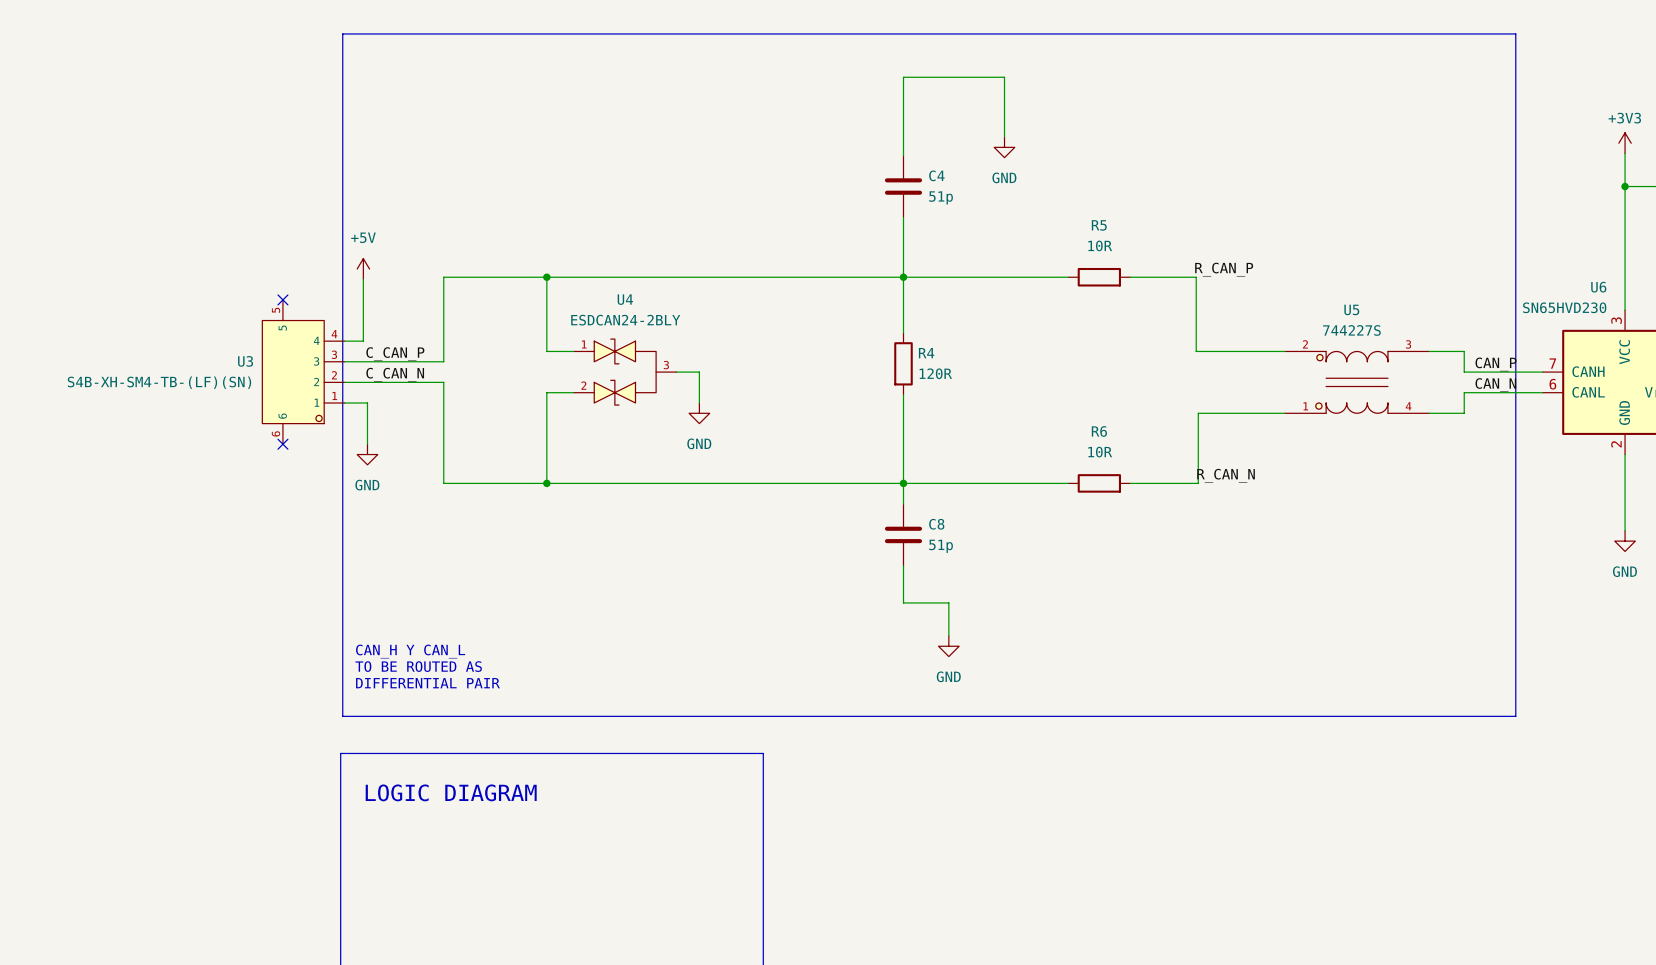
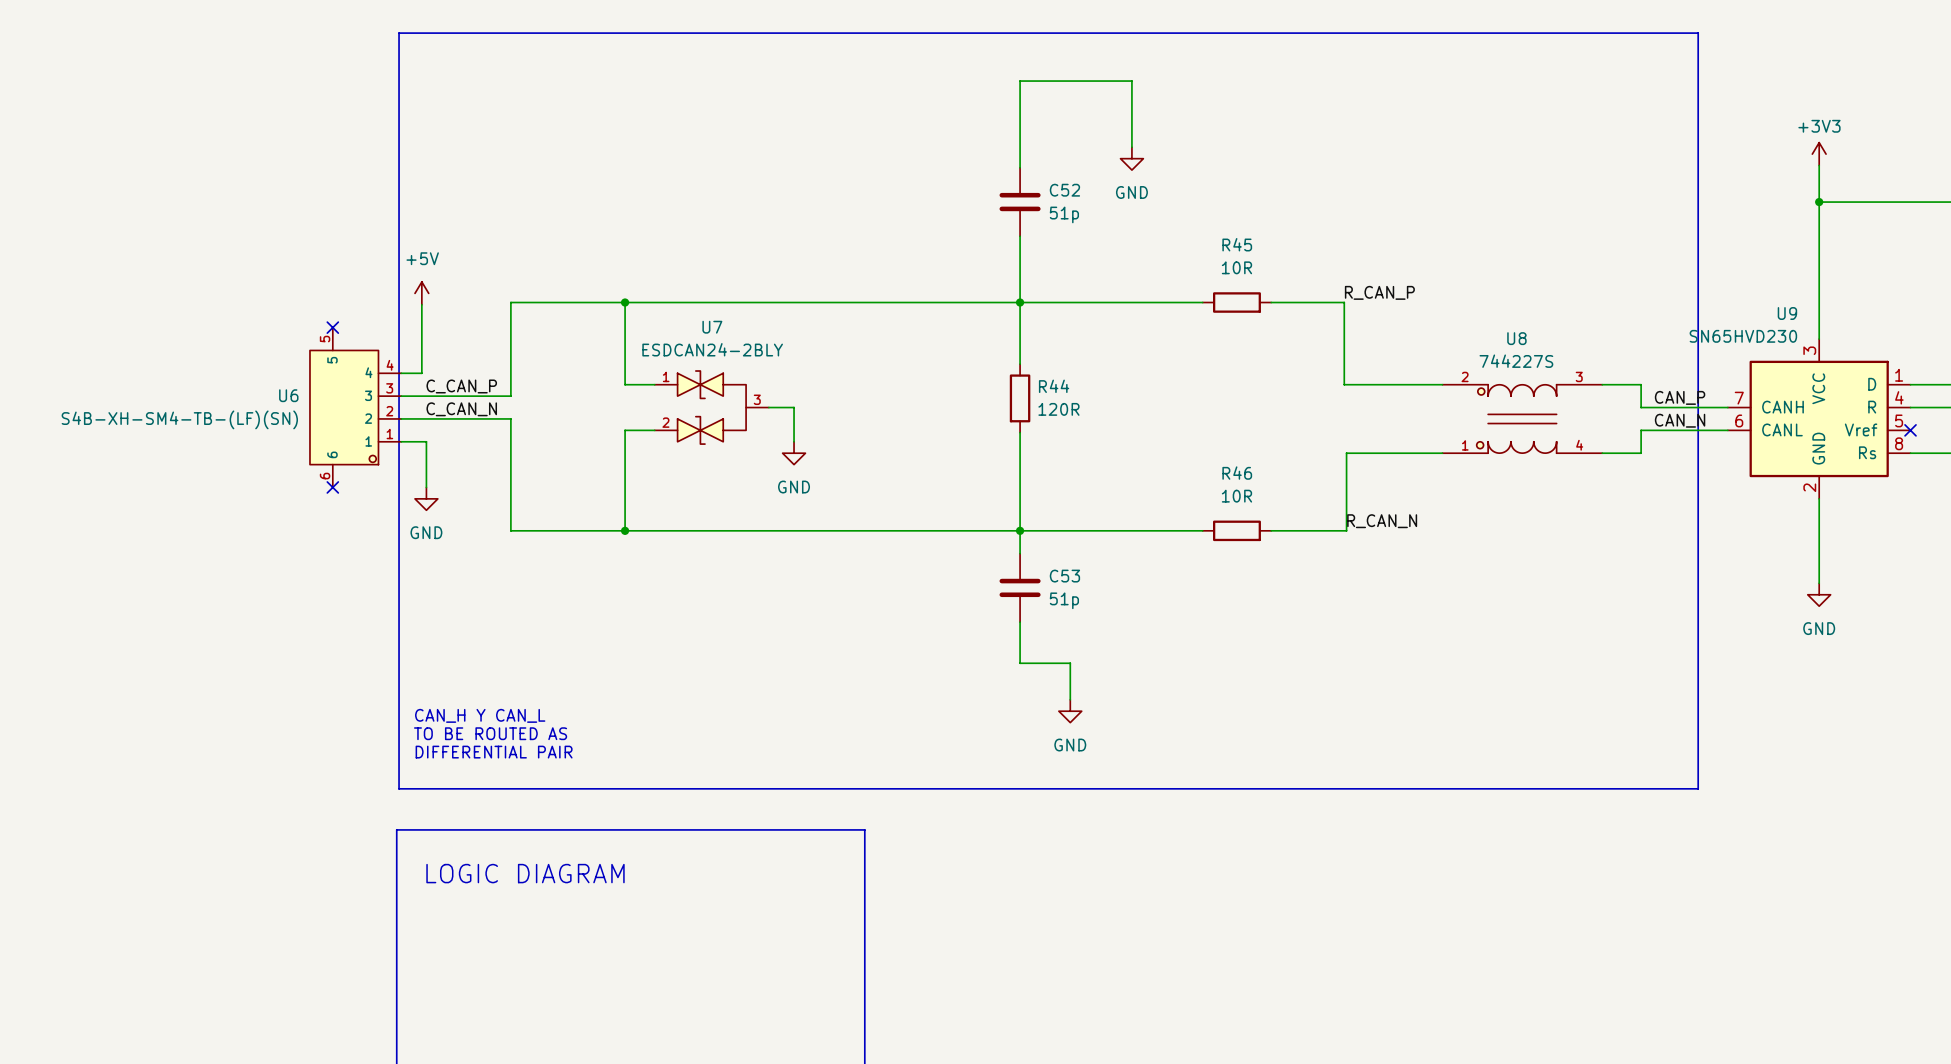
C4 name: C4 (936, 175) -> C52 (1064, 190)
R5 name: R5 (1099, 225) -> R45 (1237, 244)
U6 name: U6 (1598, 287) -> U9 (1787, 313)
U4 name: U4 (625, 299) -> U7 (712, 327)
U5 name: U5 (1351, 309) -> U8 (1516, 338)
R4 name: R4 (926, 353) -> R44 (1054, 386)
U3 name: U3 (245, 361) -> U6 (288, 395)
R6 name: R6 (1099, 431) -> R46 (1237, 473)
C8 name: C8 (936, 524) -> C53 (1064, 576)

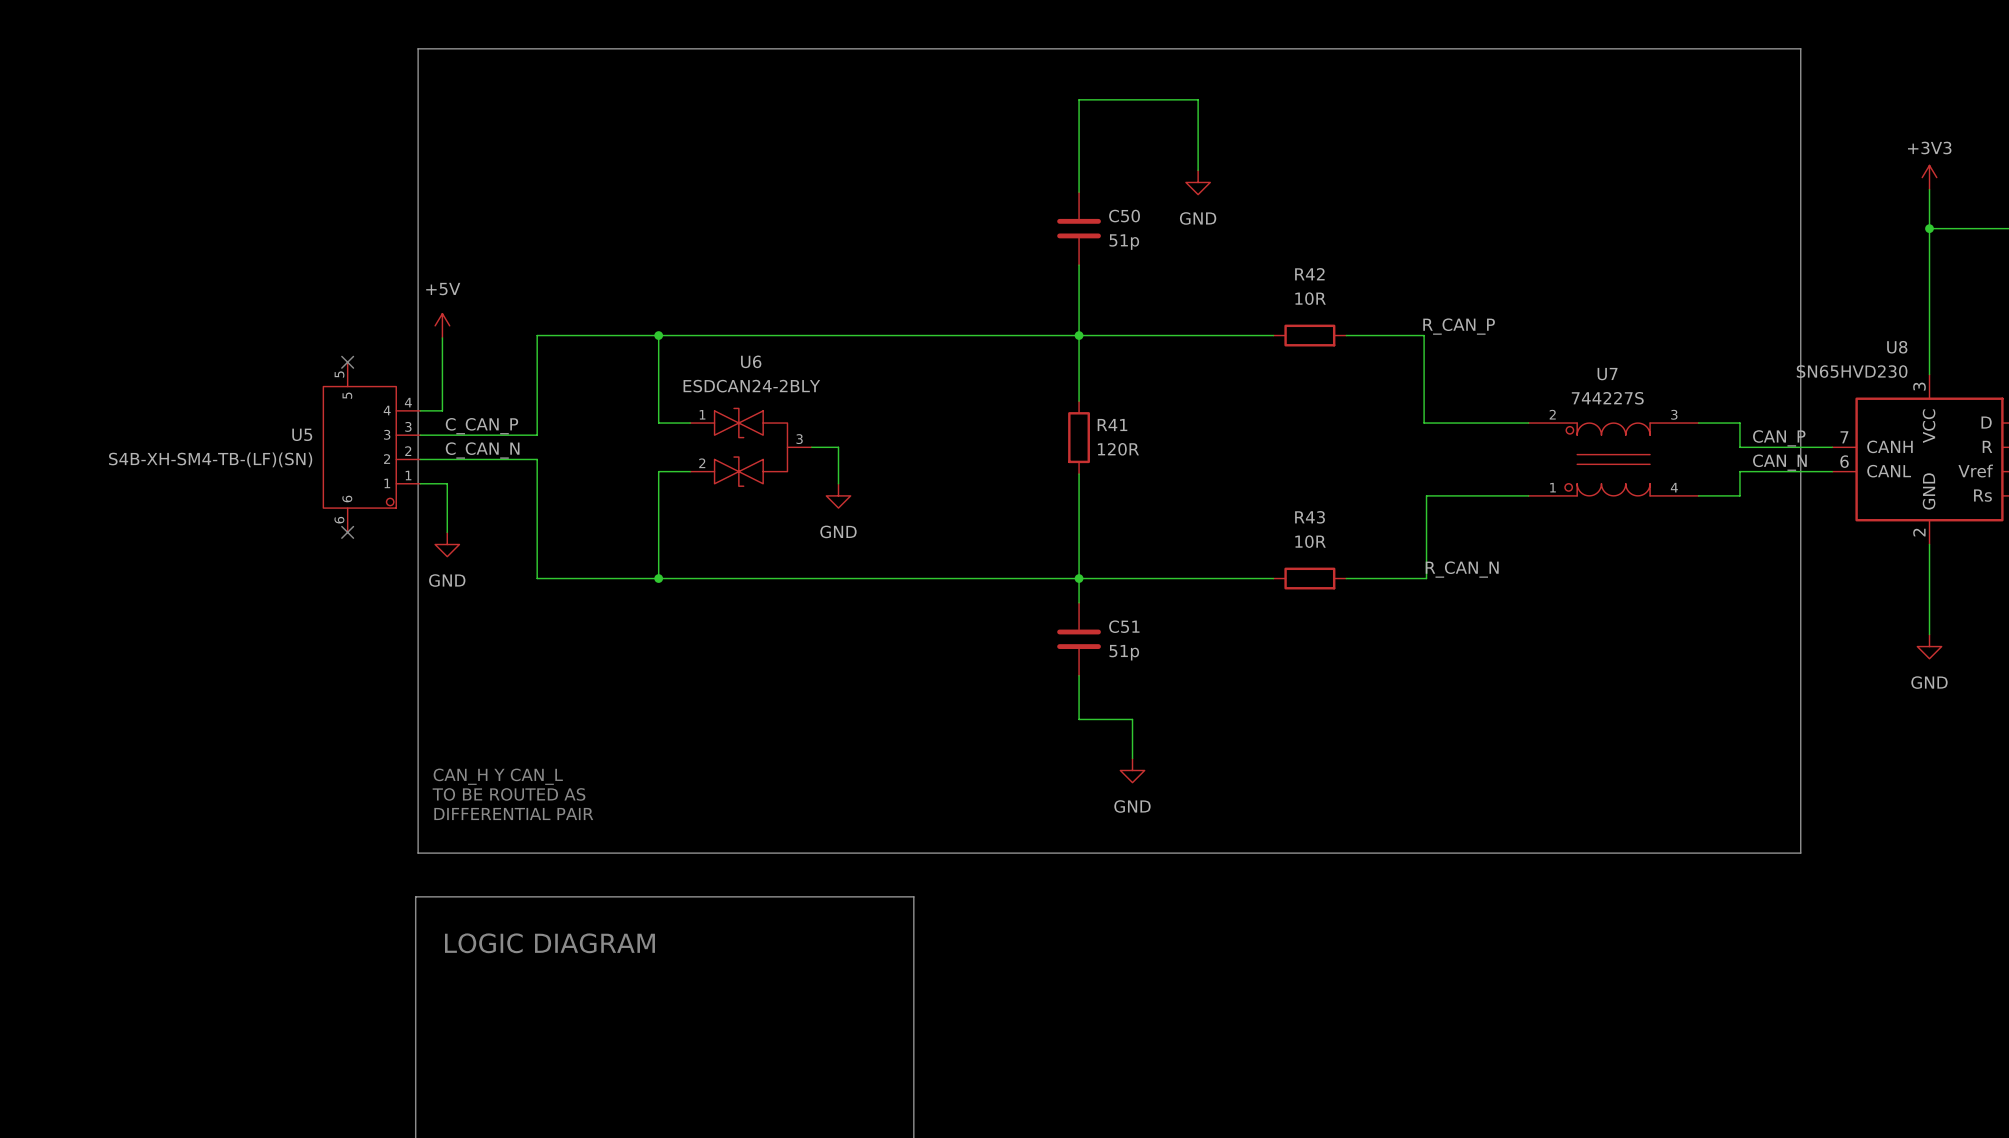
C52 name: C52 (1064, 190) -> C50 (1124, 216)
R45 name: R45 (1237, 244) -> R42 (1309, 274)
U9 name: U9 (1787, 313) -> U8 (1897, 347)
U7 name: U7 (712, 327) -> U6 (751, 361)
U8 name: U8 (1516, 338) -> U7 (1607, 374)
R44 name: R44 (1054, 386) -> R41 (1112, 425)
U6 name: U6 (288, 395) -> U5 (302, 434)
R46 name: R46 (1237, 473) -> R43 (1310, 517)
C53 name: C53 (1064, 576) -> C51 (1124, 626)

